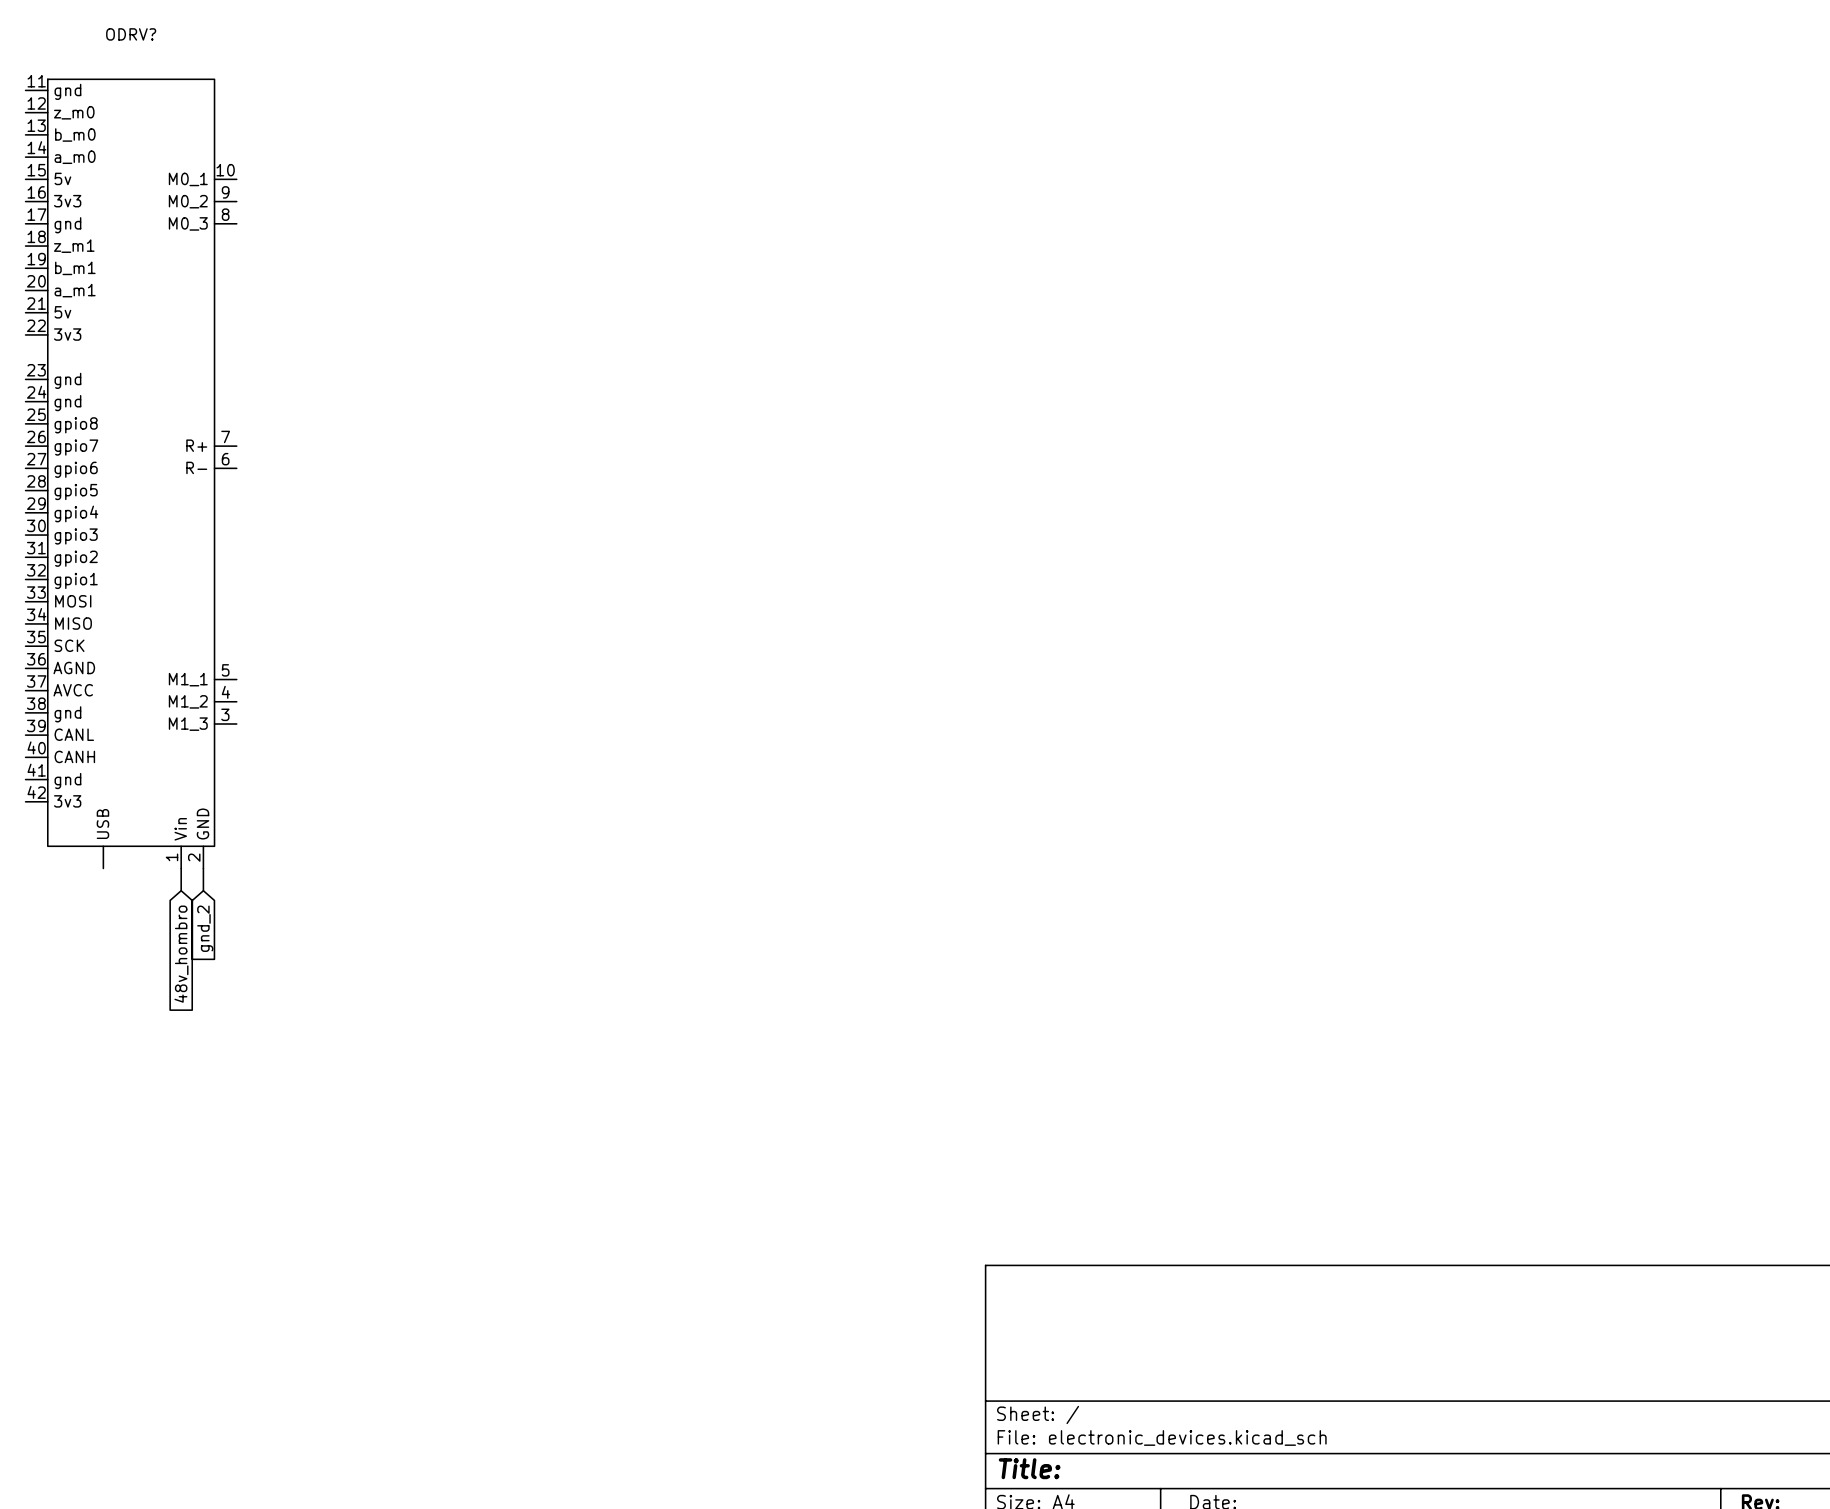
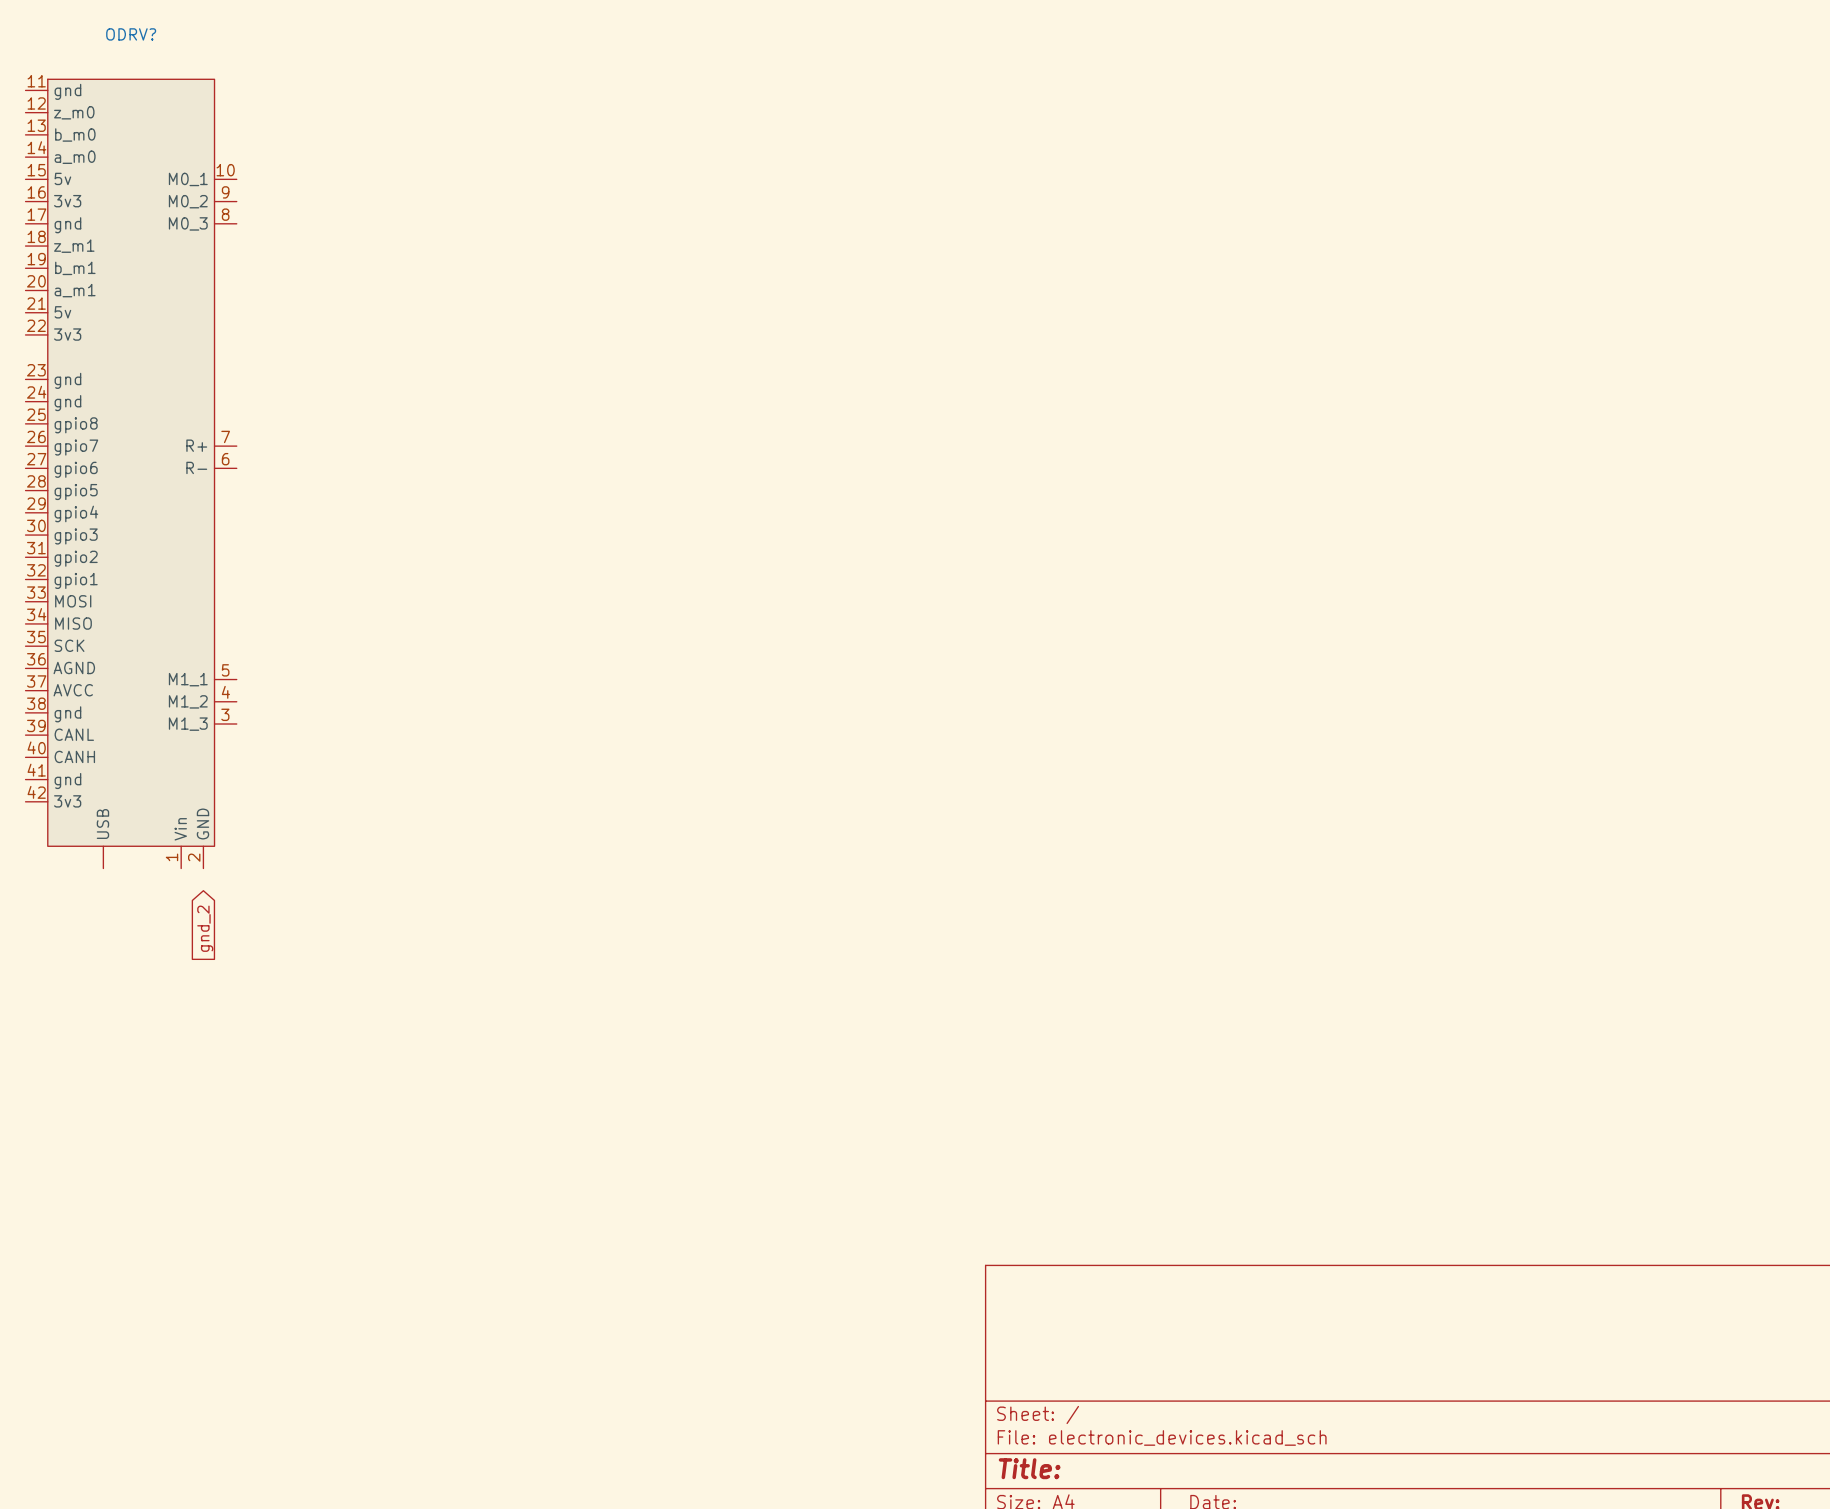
wire: (181, 868) (181, 890) -> none
wire: (203, 868) (203, 890) -> none
global label: 48v_hombro (181, 954) -> none

